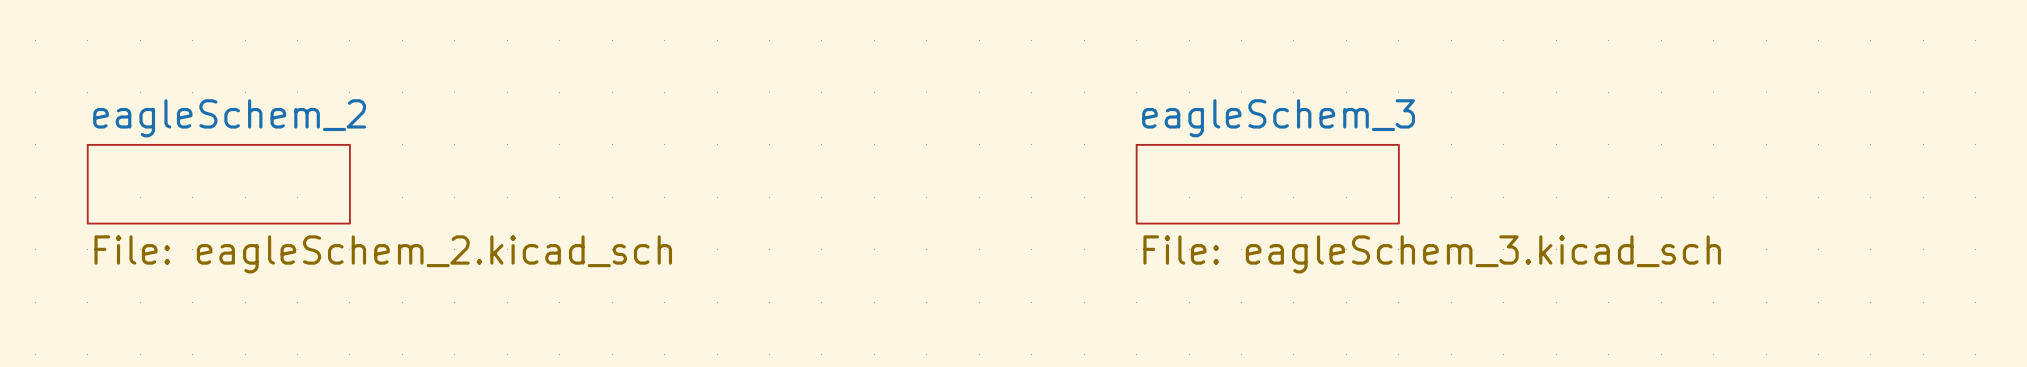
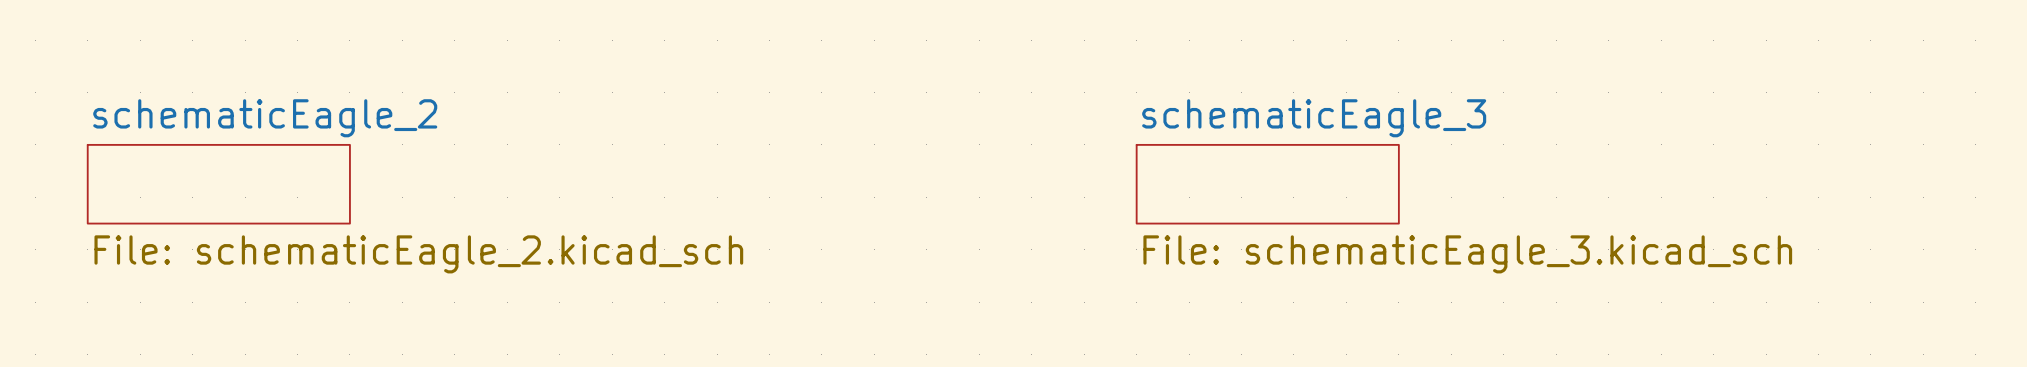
sheet eagleSchem_2 name: eagleSchem_2 (229, 118) -> schematicEagle_2 (265, 118)
sheet eagleSchem_3 name: eagleSchem_3 (1278, 118) -> schematicEagle_3 (1314, 118)
sheet eagleSchem_2 value: File: eagleSchem_2.kicad_sch (383, 254) -> File: schematicEagle_2.kicad_sch (418, 254)
sheet eagleSchem_3 value: File: eagleSchem_3.kicad_sch (1432, 254) -> File: schematicEagle_3.kicad_sch (1467, 254)

